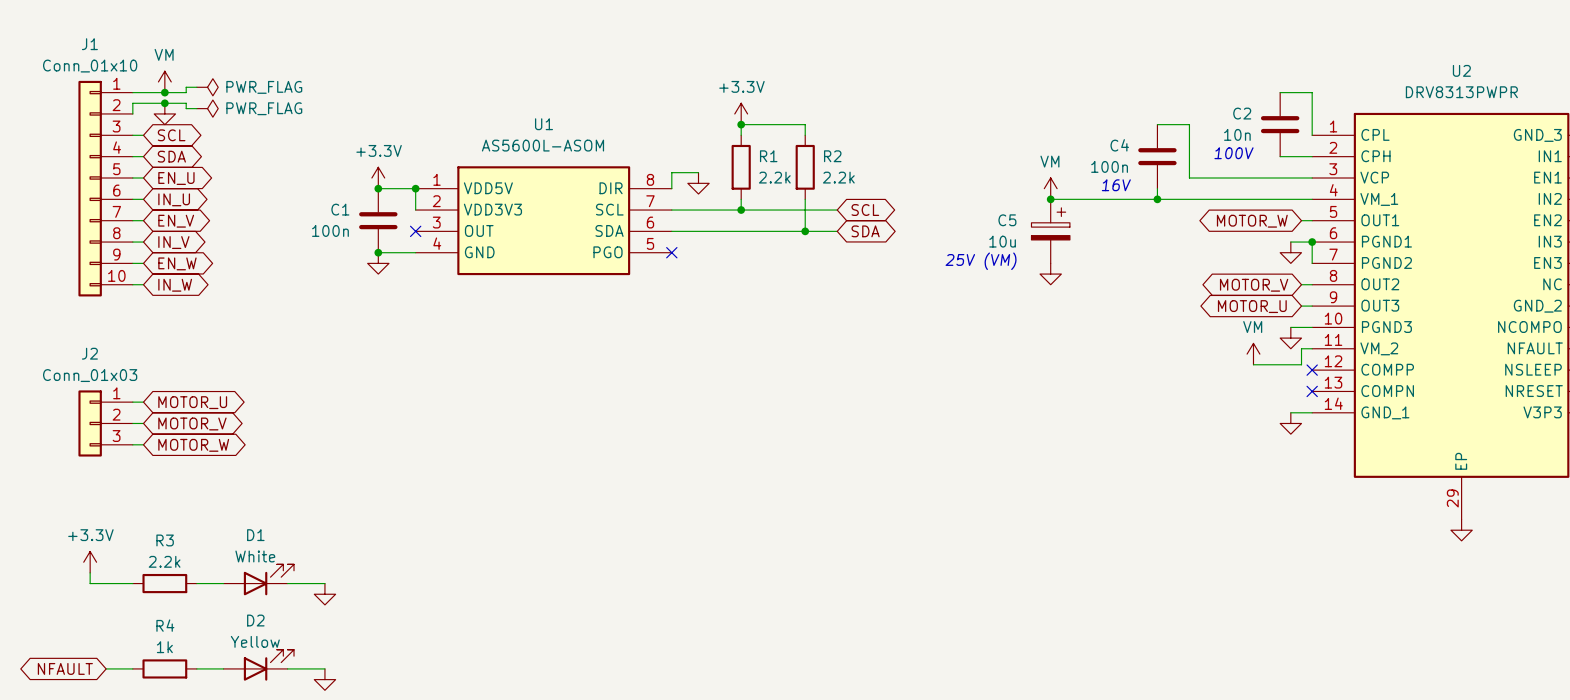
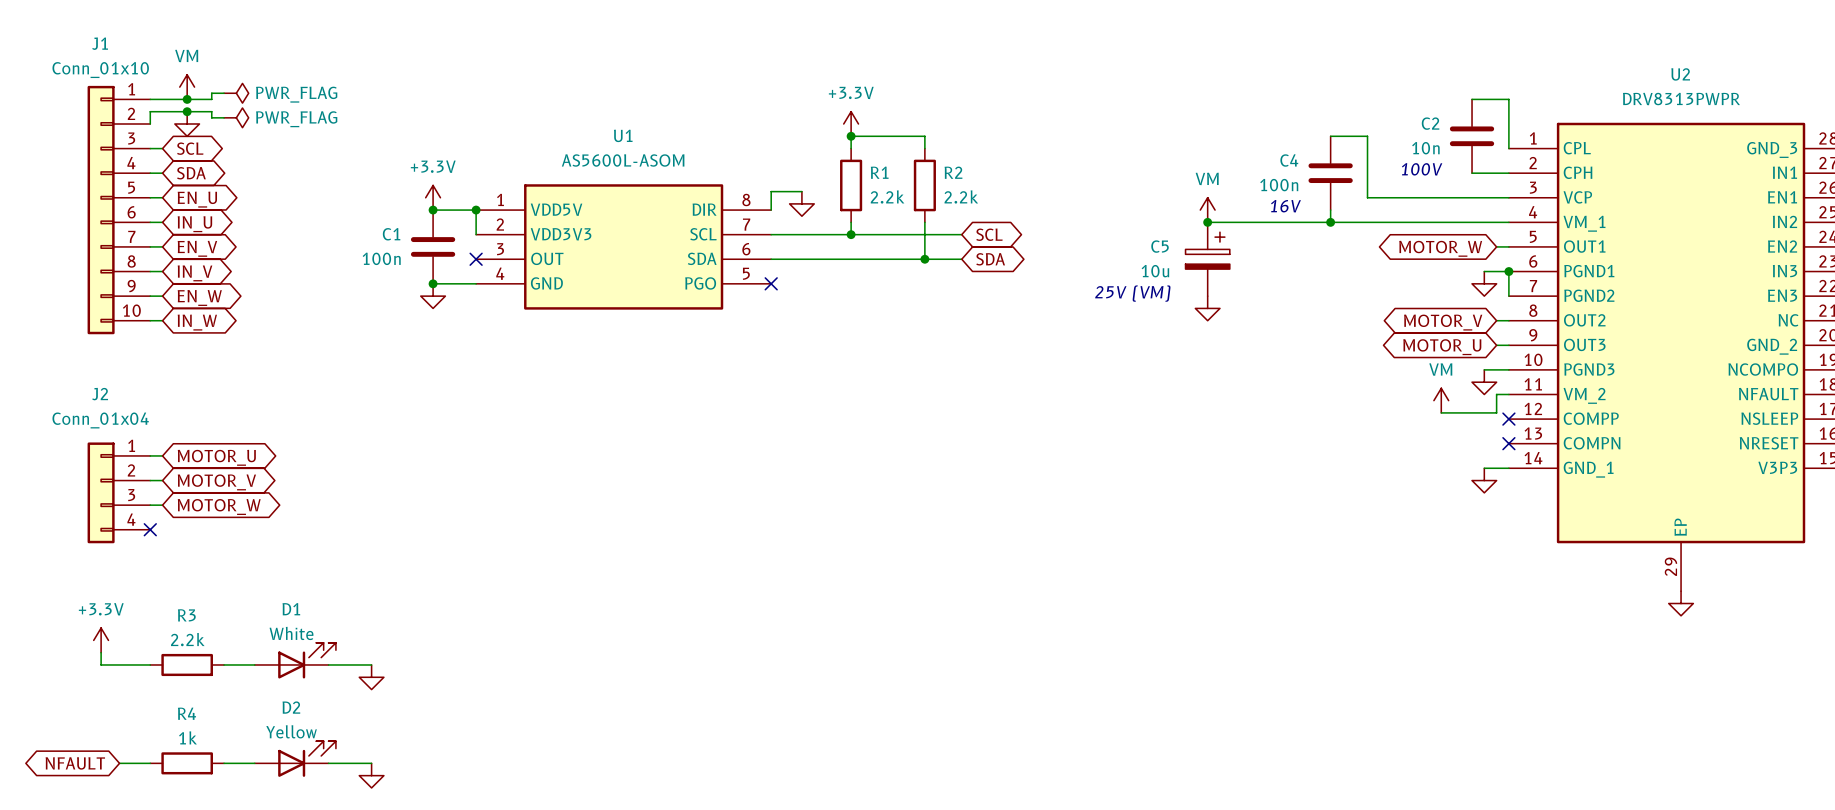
J2 value: Conn_01x03 (90, 375) -> Conn_01x04 (100, 420)
J2 symbol: [78, 390, 133, 457] -> [87, 442, 151, 544]
no-connect mark: none -> (150, 529)

